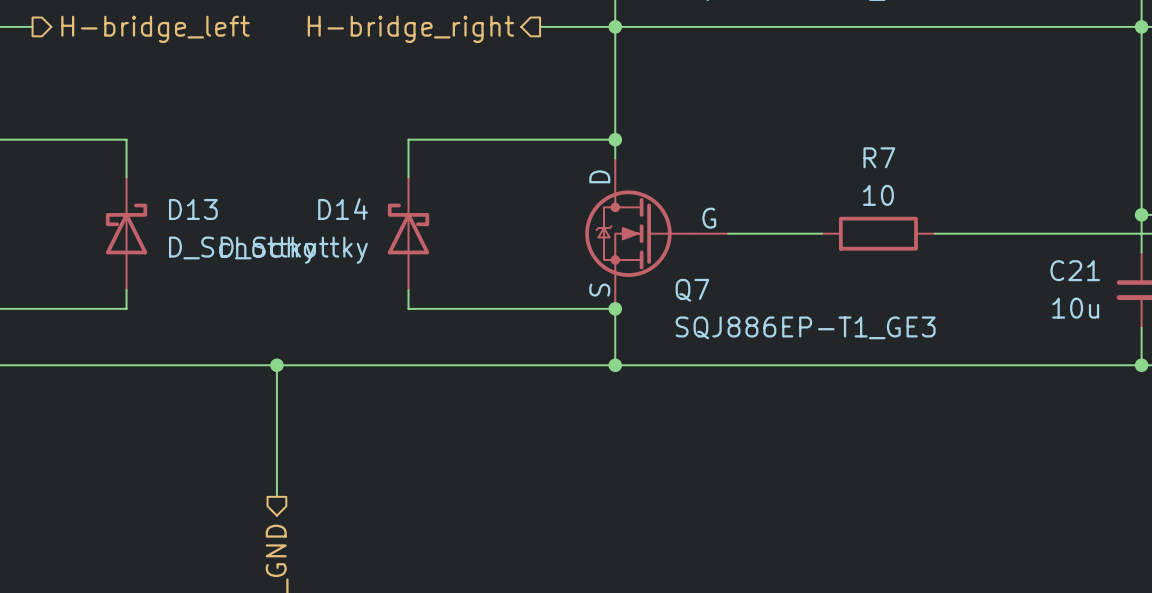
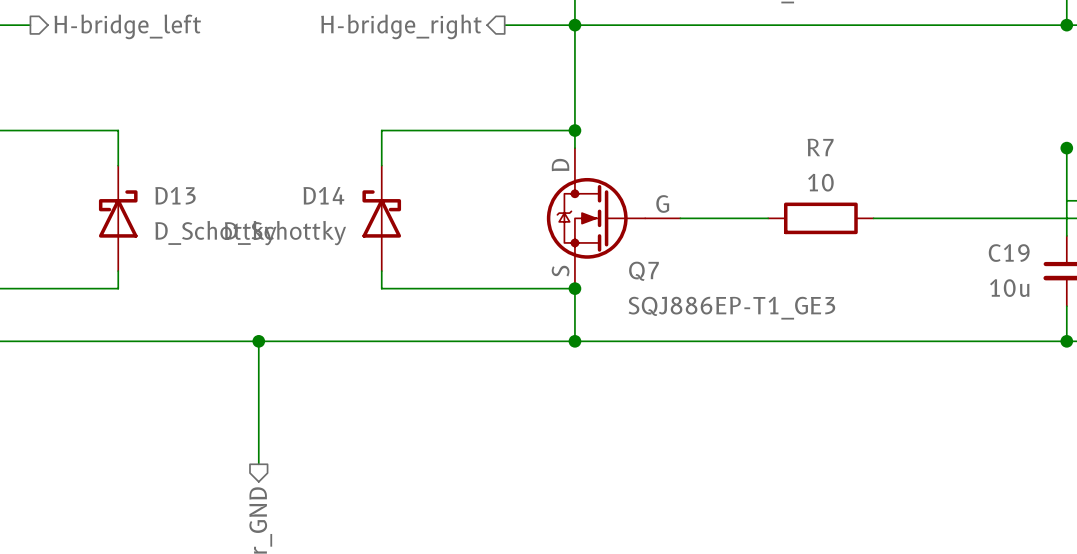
wire: (1141, 26) (1141, 158) -> none
junction position: (1141, 214) -> (1066, 148)
C21 name: C21 (1075, 270) -> C19 (1009, 253)

